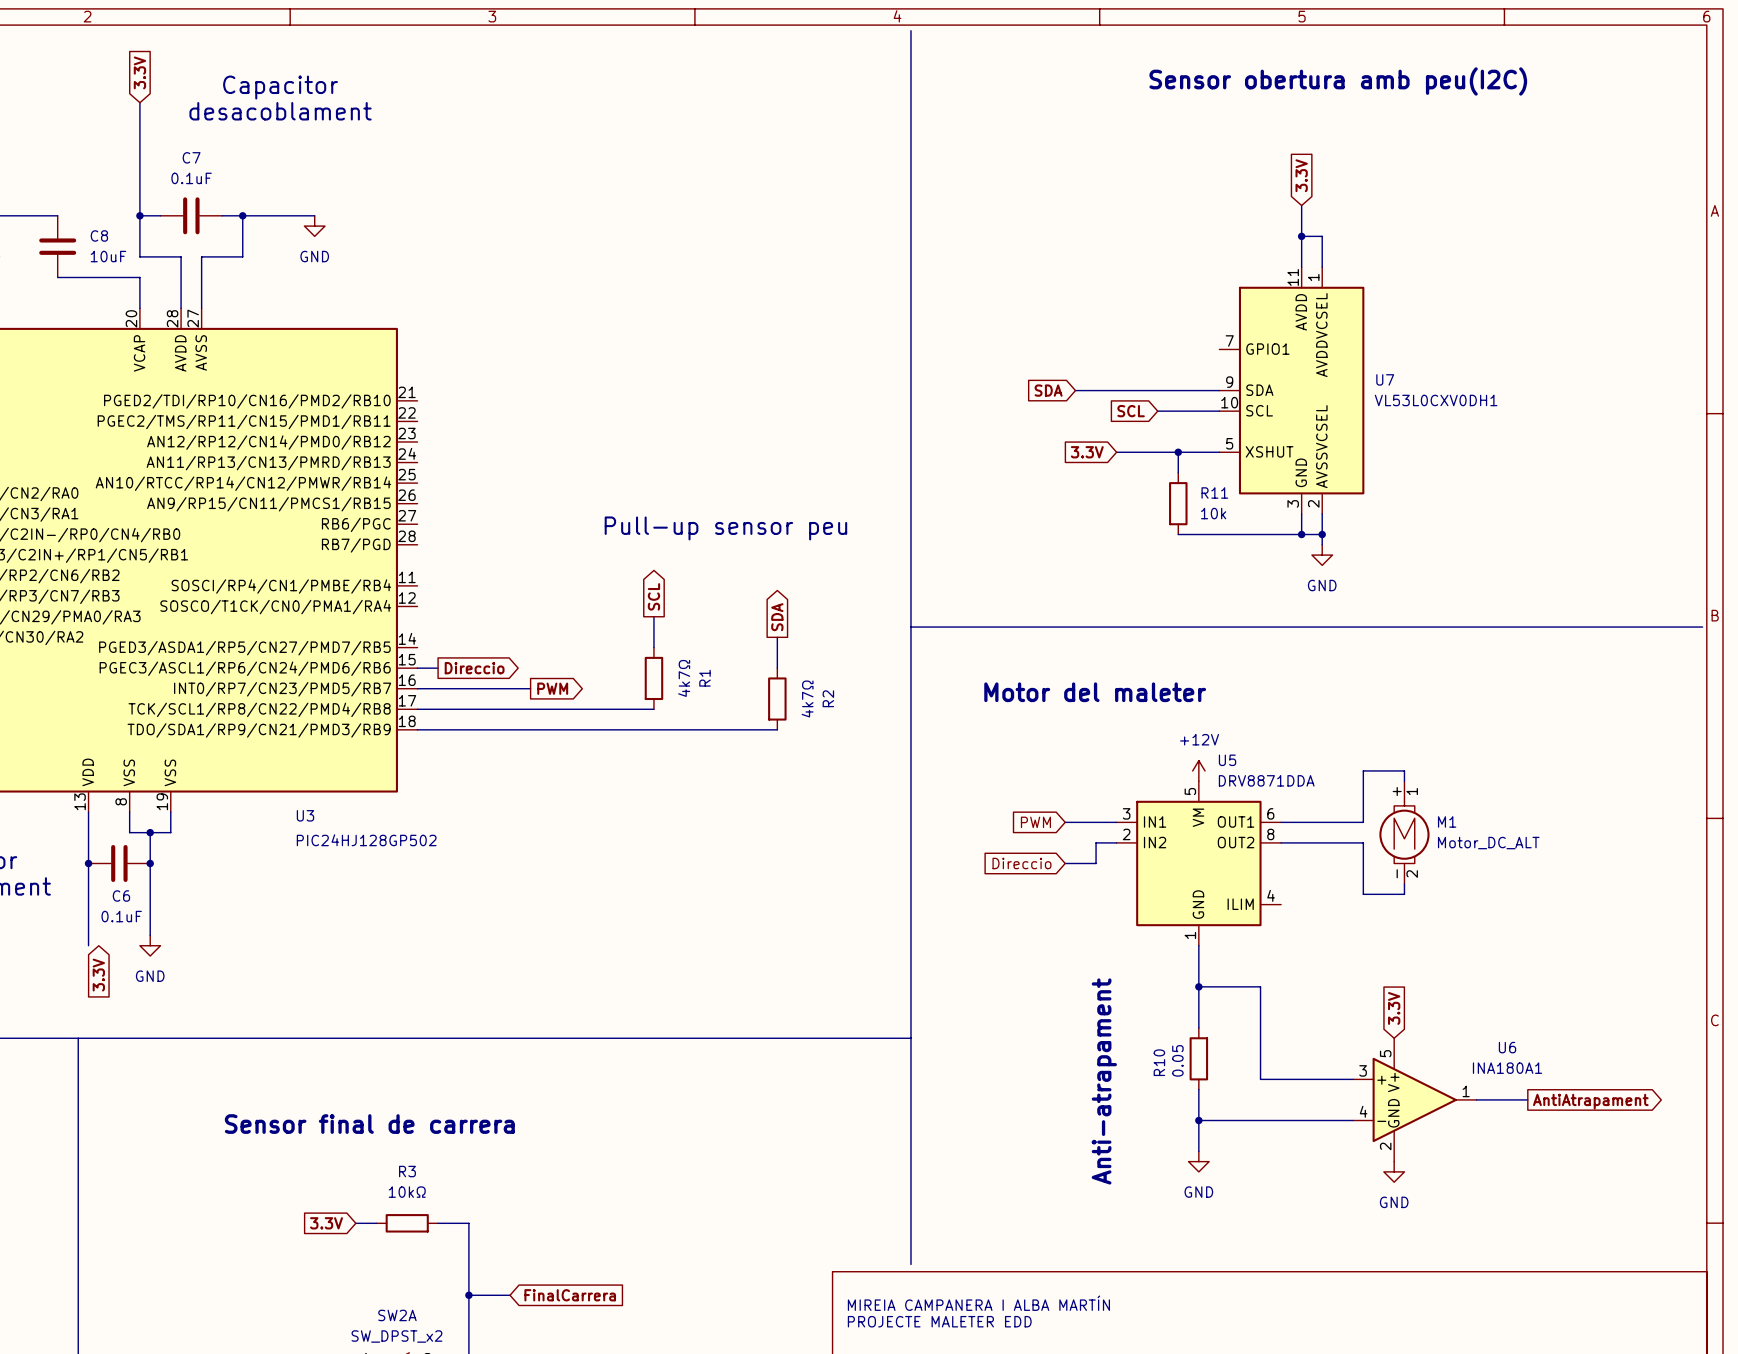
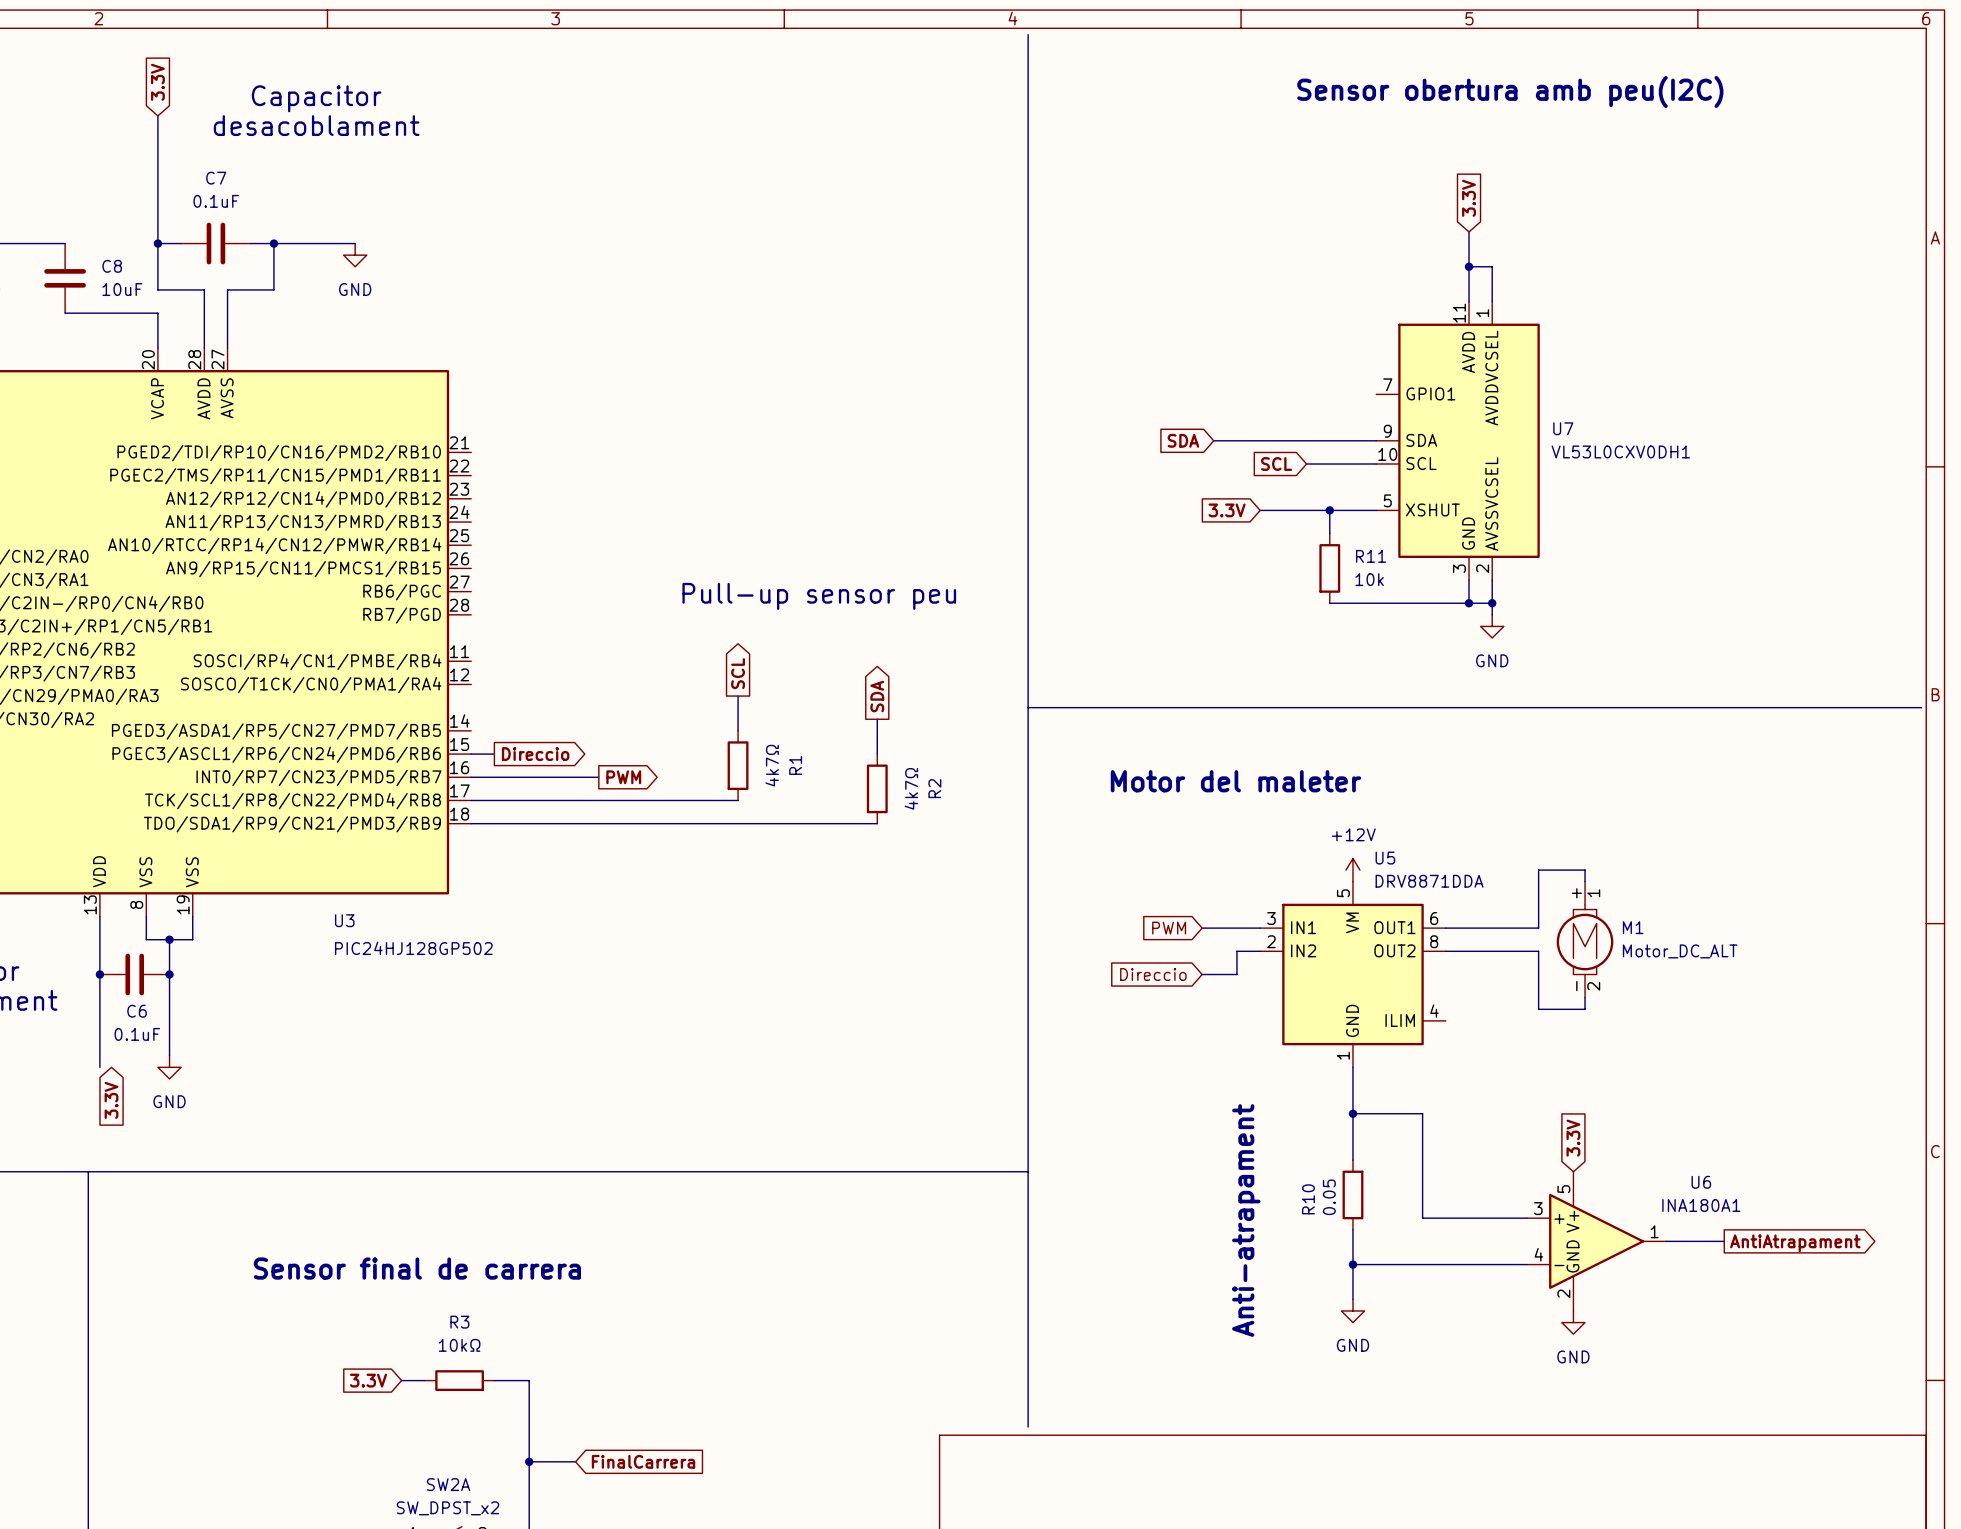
text: MIREIA CAMPANERA I ALBA MARTÍN (978, 1303) -> none
text: PROJECTE MALETER EDD (939, 1321) -> none

